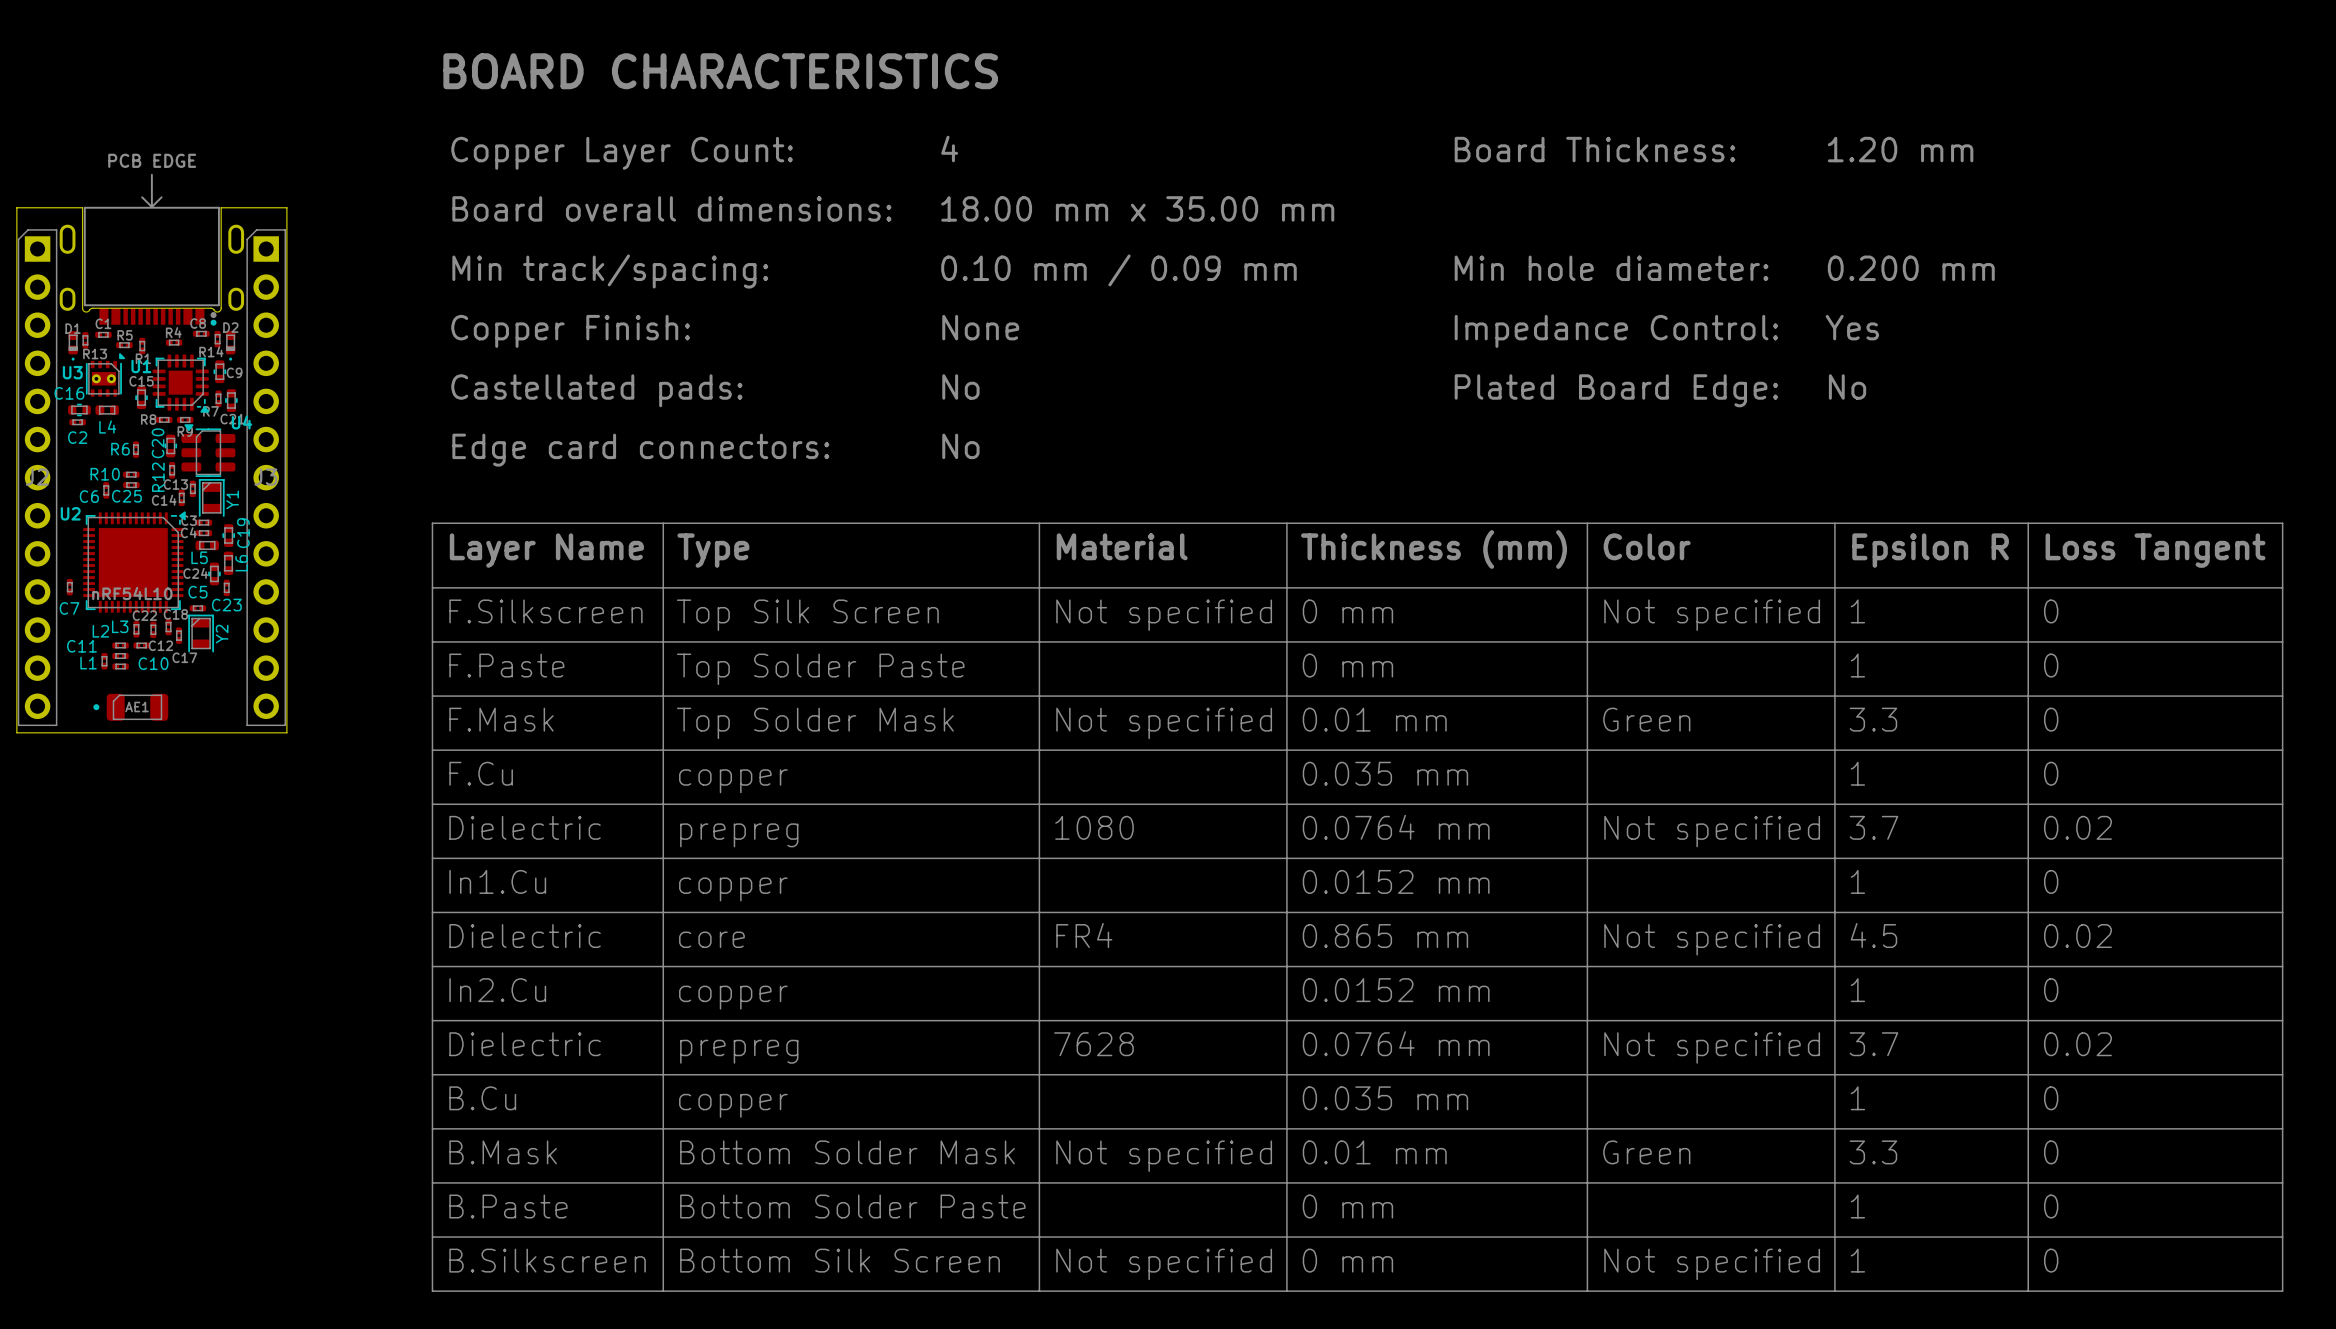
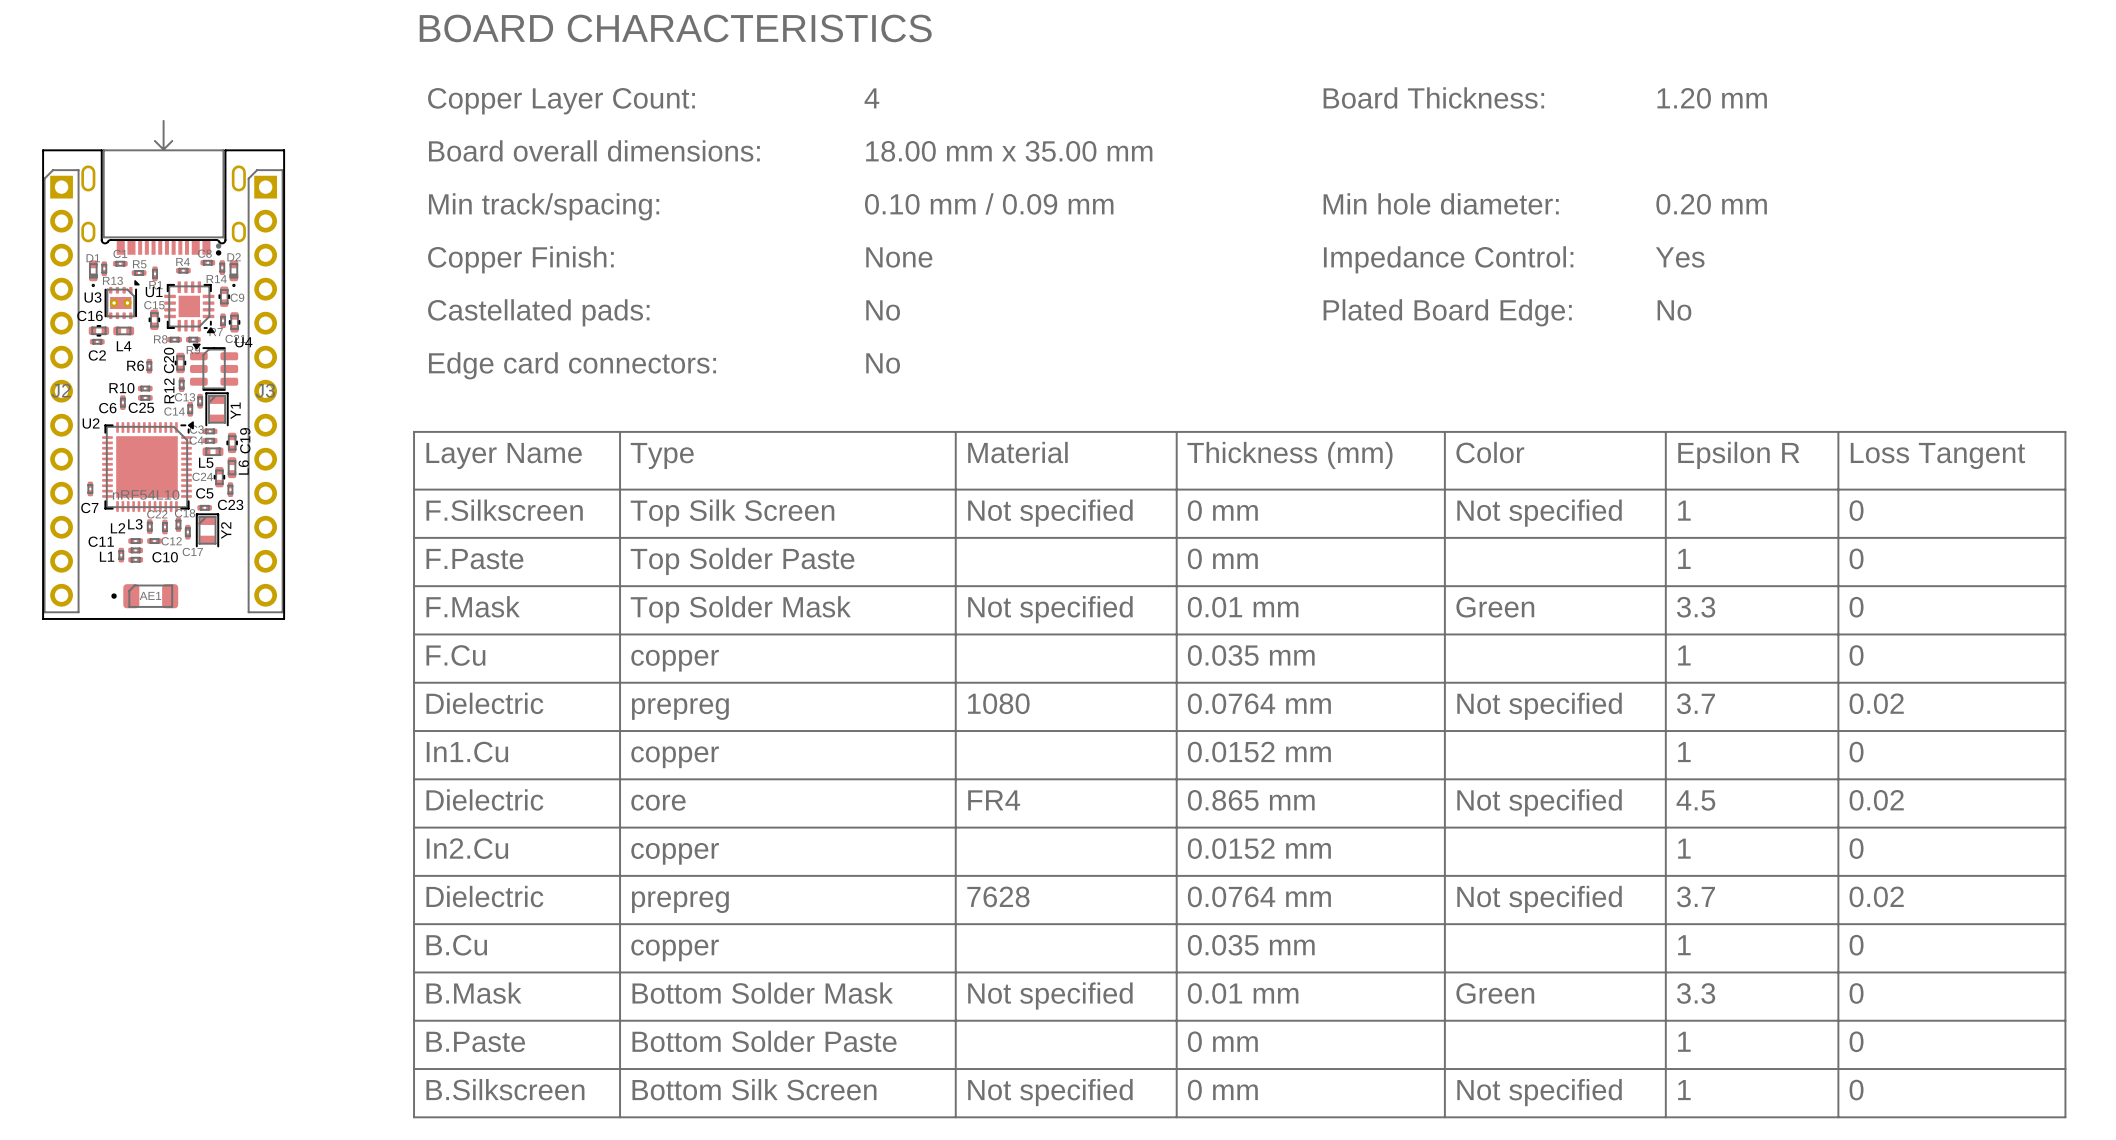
part text: PCB EDGE (152, 160) -> none
text: 0.200 mm (1911, 268) -> 0.20 mm (1711, 204)

